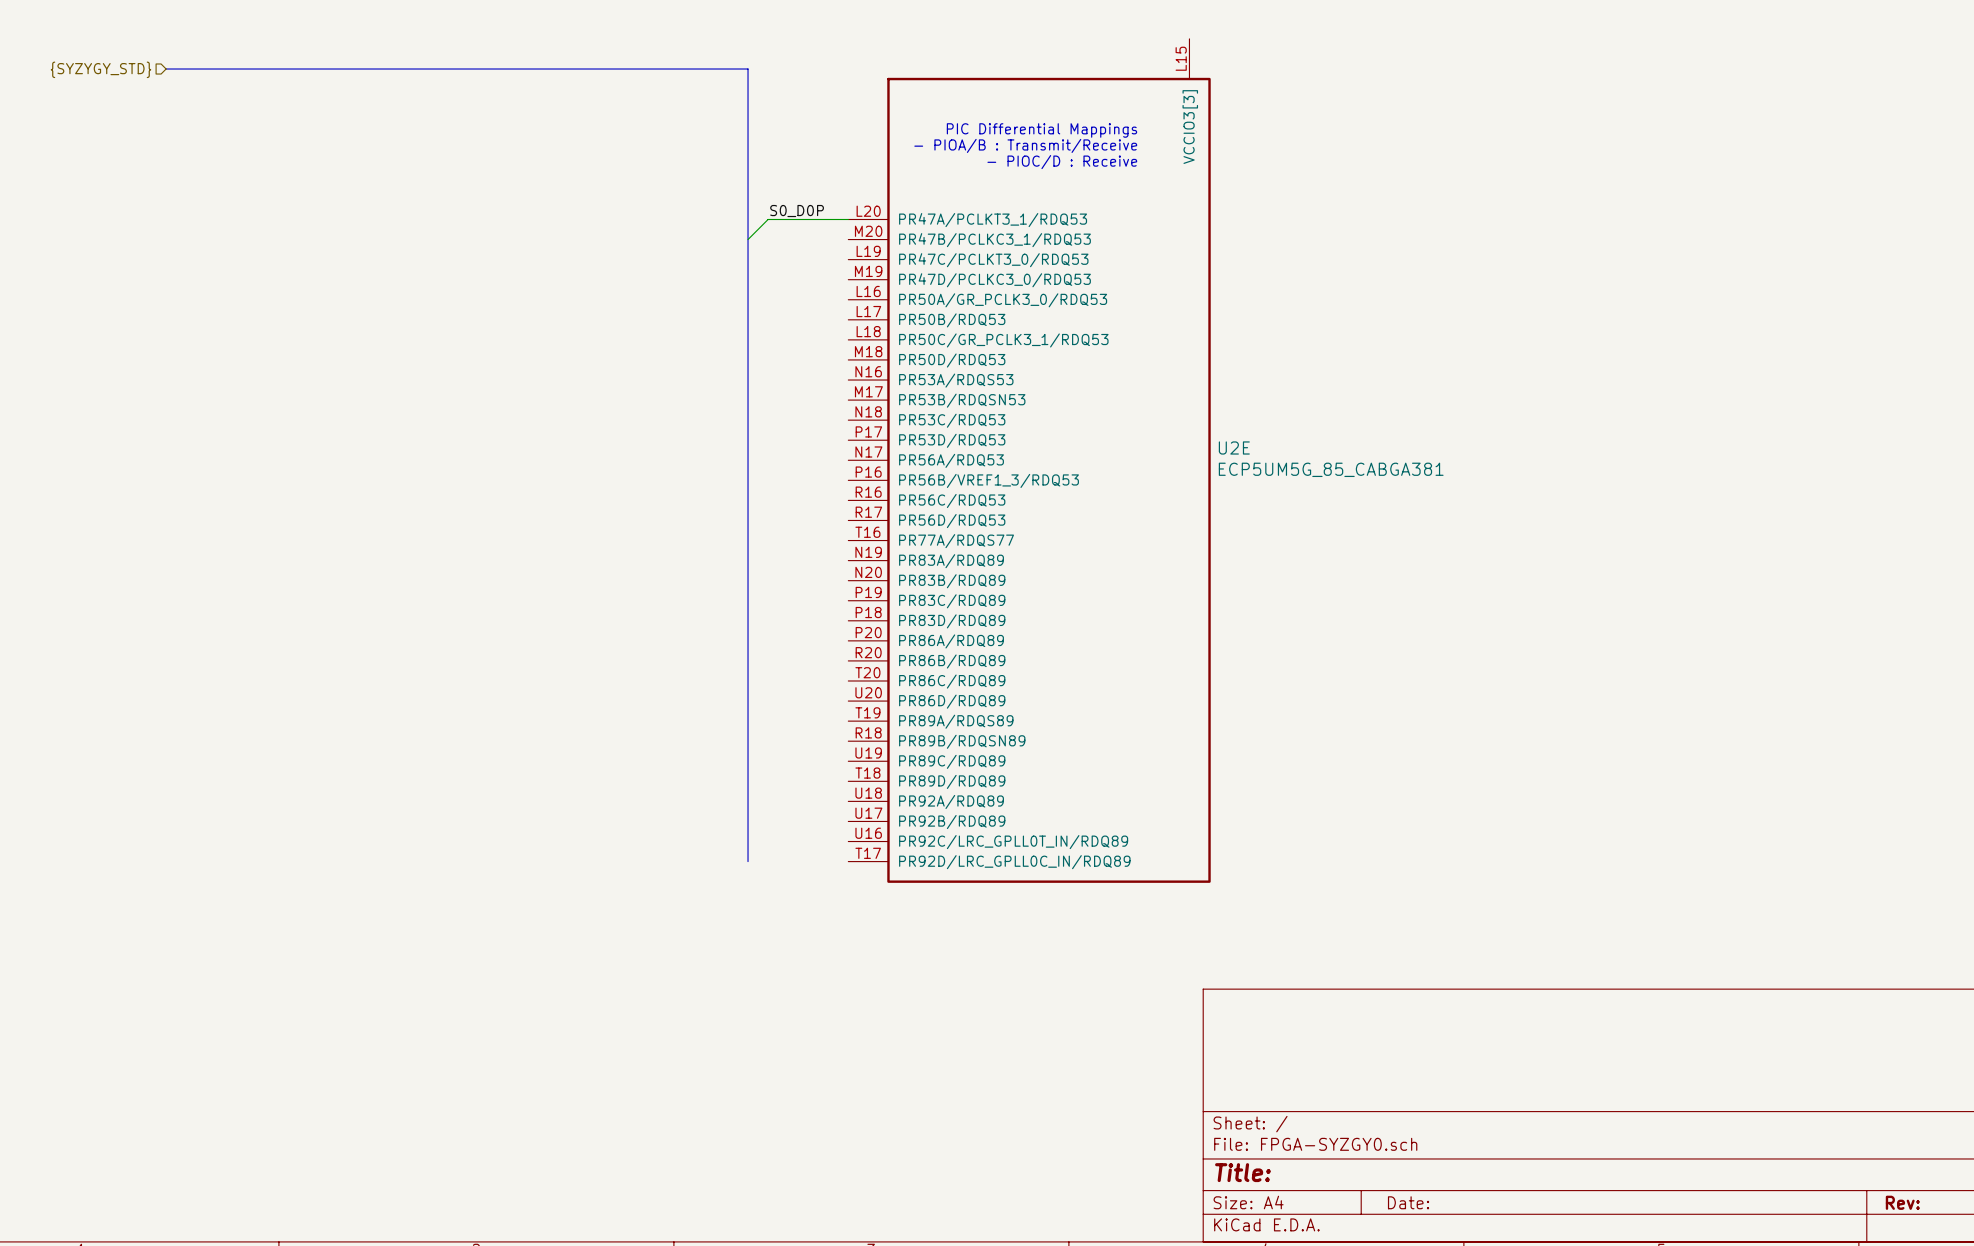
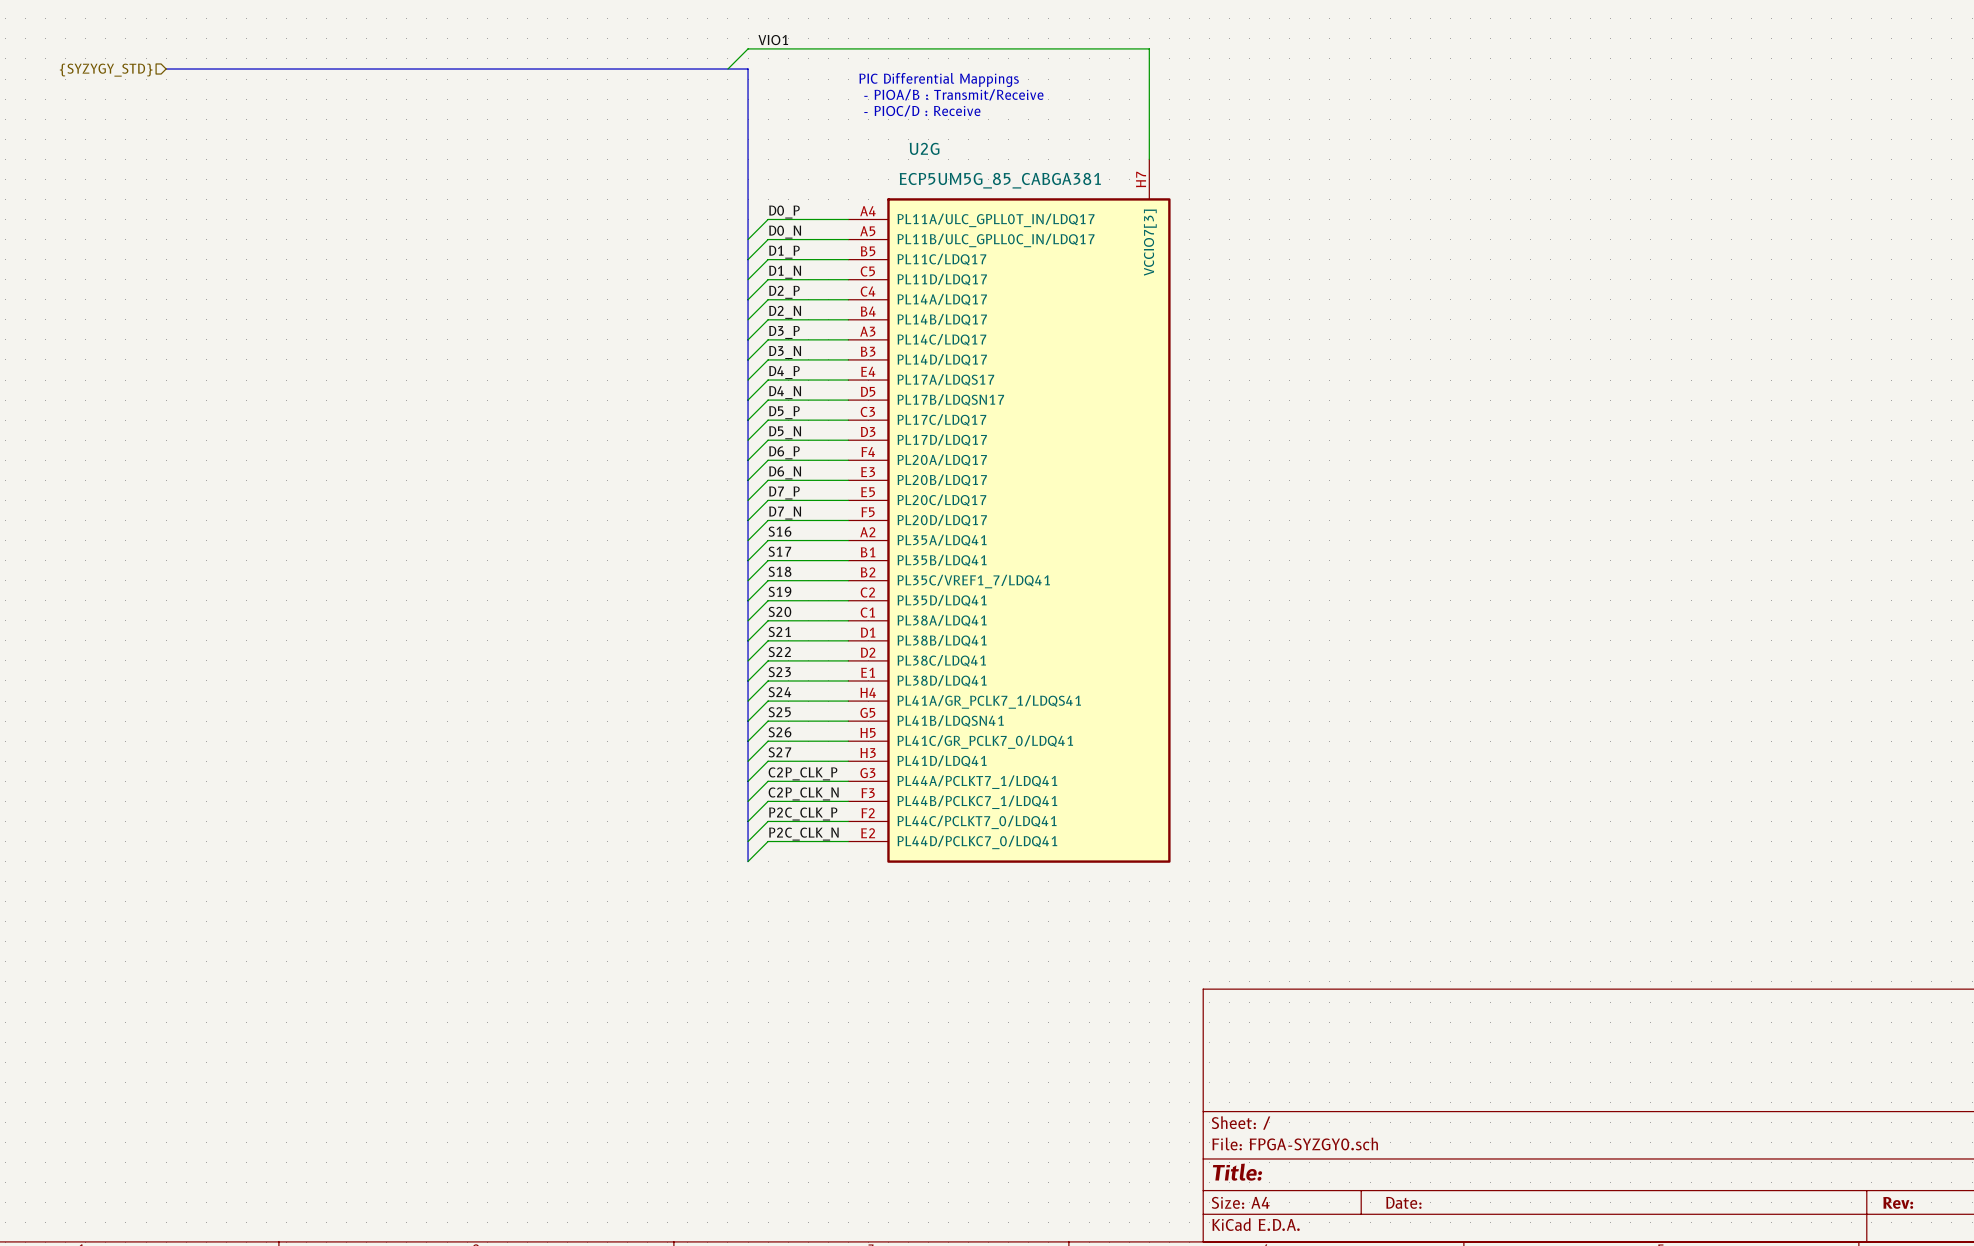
label: none -> VIO1 (773, 40)
wire: none -> (727, 69) (748, 48) (1149, 48) (1149, 159)
text: none -> PIC Differential Mappings (939, 80)
text: none -> - PIOA/B : Transmit/Receive (953, 94)
text: none -> - PIOC/D : Receive (922, 111)
text: PIC Differential Mappings (1041, 130) -> none
text: - PIOA/B : Transmit/Receive (1025, 145) -> none
text: - PIOC/D : Receive (1062, 162) -> none
label: S0_D0P (797, 211) -> D0_P (784, 212)
label: none -> D0_N (785, 232)
wire: none -> (848, 239) (768, 239) (748, 259)
label: none -> D1_P (784, 252)
wire: none -> (848, 259) (768, 259) (748, 279)
label: none -> D1_N (785, 272)
wire: none -> (848, 279) (768, 279) (748, 299)
label: none -> D2_P (784, 292)
wire: none -> (848, 299) (768, 299) (748, 319)
label: none -> D2_N (785, 312)
wire: none -> (848, 319) (768, 319) (748, 339)
label: none -> D3_P (784, 332)
wire: none -> (848, 339) (768, 339) (748, 359)
label: none -> D3_N (785, 352)
wire: none -> (848, 359) (768, 359) (748, 380)
label: none -> D4_P (784, 372)
wire: none -> (848, 380) (768, 380) (748, 400)
label: none -> D4_N (785, 392)
wire: none -> (848, 400) (768, 400) (748, 420)
label: none -> D5_P (784, 412)
wire: none -> (848, 420) (768, 420) (748, 440)
label: none -> D5_N (785, 432)
wire: none -> (848, 440) (768, 440) (748, 460)
label: none -> D6_P (784, 452)
wire: none -> (848, 460) (768, 460) (748, 480)
U2E: ECP5UM5G_85_CABGA381 (1029, 460) -> none
label: none -> D6_N (785, 472)
wire: none -> (848, 480) (768, 480) (748, 500)
label: none -> D7_P (784, 492)
wire: none -> (848, 500) (768, 500) (748, 520)
U2G: none -> ECP5UM5G_85_CABGA381 (1009, 511)
label: none -> D7_N (785, 513)
wire: none -> (848, 520) (768, 520) (748, 540)
label: none -> S16 (779, 531)
wire: none -> (848, 540) (768, 540) (748, 560)
label: none -> S17 (779, 551)
wire: none -> (848, 560) (768, 560) (748, 580)
label: none -> S18 (780, 571)
wire: none -> (848, 580) (768, 580) (748, 600)
label: none -> S19 (779, 591)
wire: none -> (848, 600) (768, 600) (748, 620)
label: none -> S20 (779, 611)
wire: none -> (848, 620) (768, 620) (748, 640)
label: none -> S21 (779, 631)
wire: none -> (848, 640) (768, 640) (748, 660)
label: none -> S22 (779, 652)
wire: none -> (848, 660) (768, 660) (748, 680)
label: none -> S23 (779, 672)
wire: none -> (848, 680) (768, 680) (748, 701)
label: none -> S24 (779, 692)
wire: none -> (848, 701) (768, 701) (748, 721)
label: none -> S25 (779, 712)
wire: none -> (848, 721) (768, 721) (748, 741)
label: none -> S26 (779, 732)
wire: none -> (848, 741) (768, 741) (748, 761)
label: none -> S27 (779, 752)
wire: none -> (848, 761) (768, 761) (748, 781)
label: none -> C2P_CLK_P (802, 773)
wire: none -> (848, 781) (768, 781) (748, 801)
label: none -> C2P_CLK_N (803, 793)
wire: none -> (848, 801) (768, 801) (748, 821)
label: none -> P2C_CLK_P (803, 814)
wire: none -> (848, 821) (768, 821) (748, 841)
label: none -> P2C_CLK_N (803, 834)
wire: none -> (848, 841) (768, 841) (748, 861)

